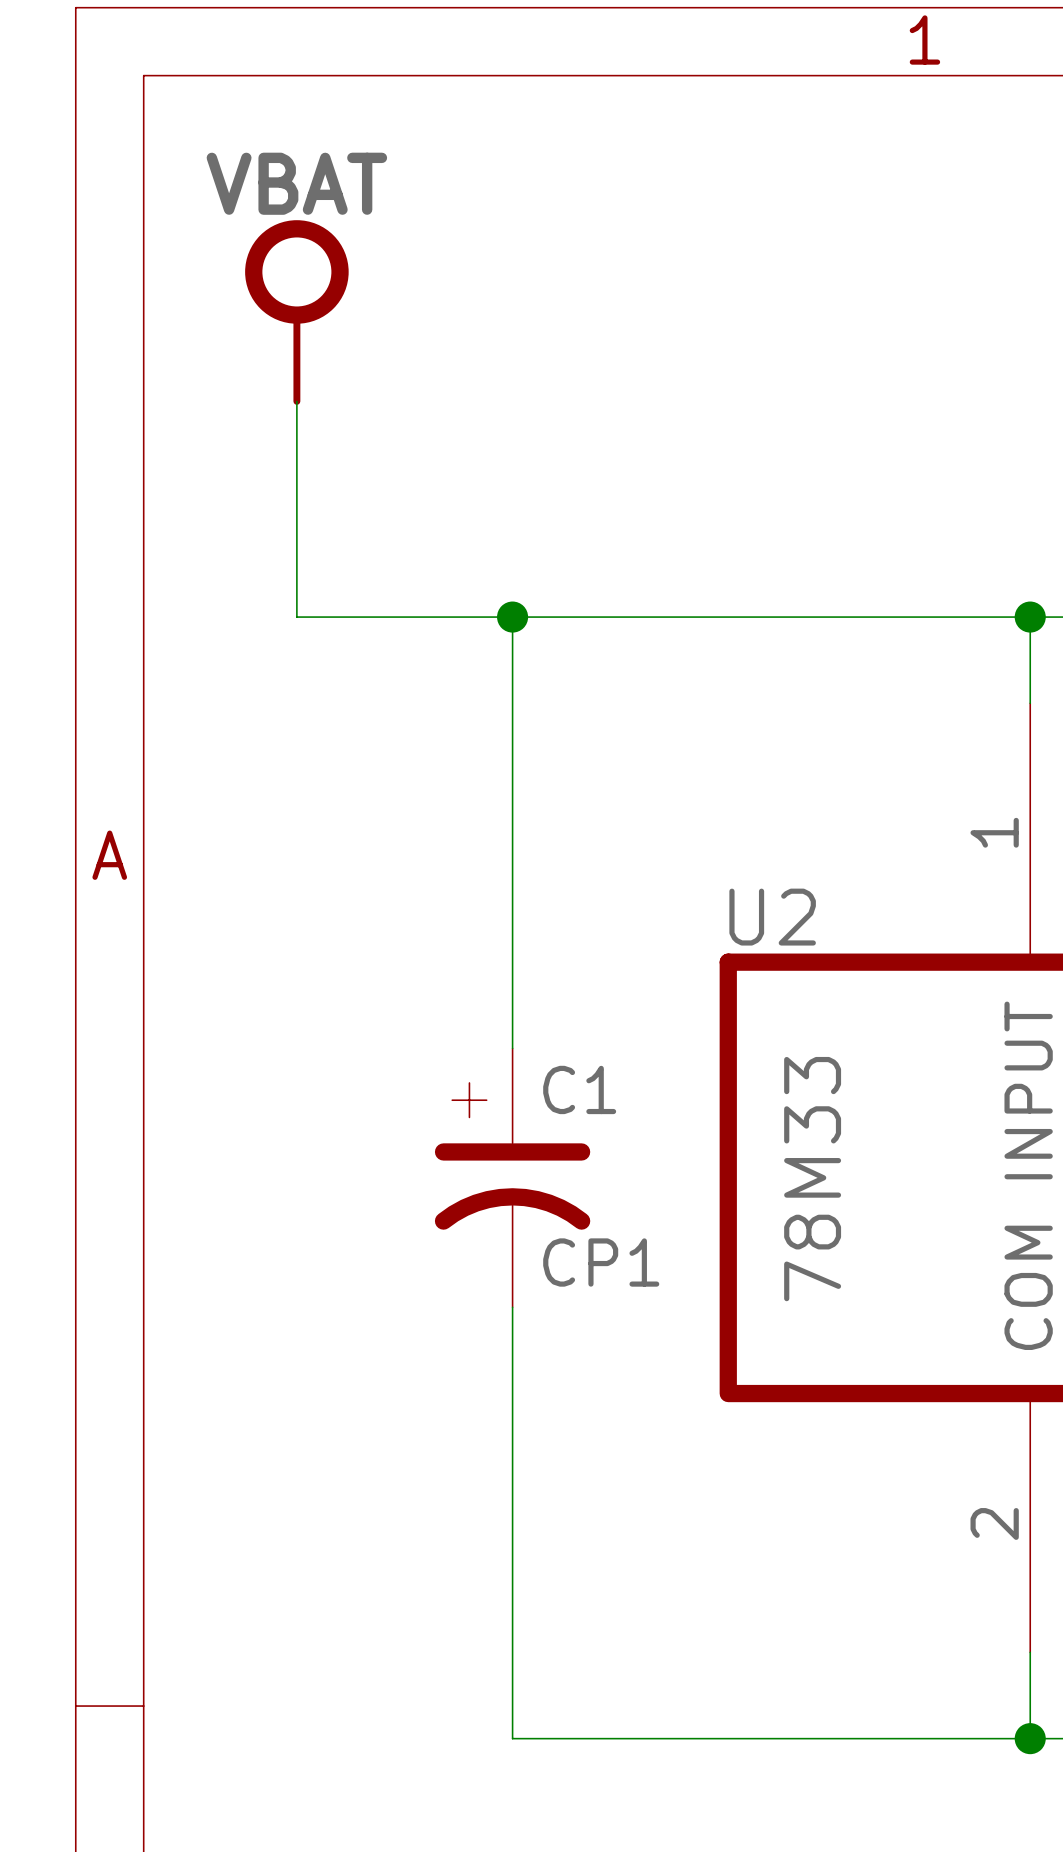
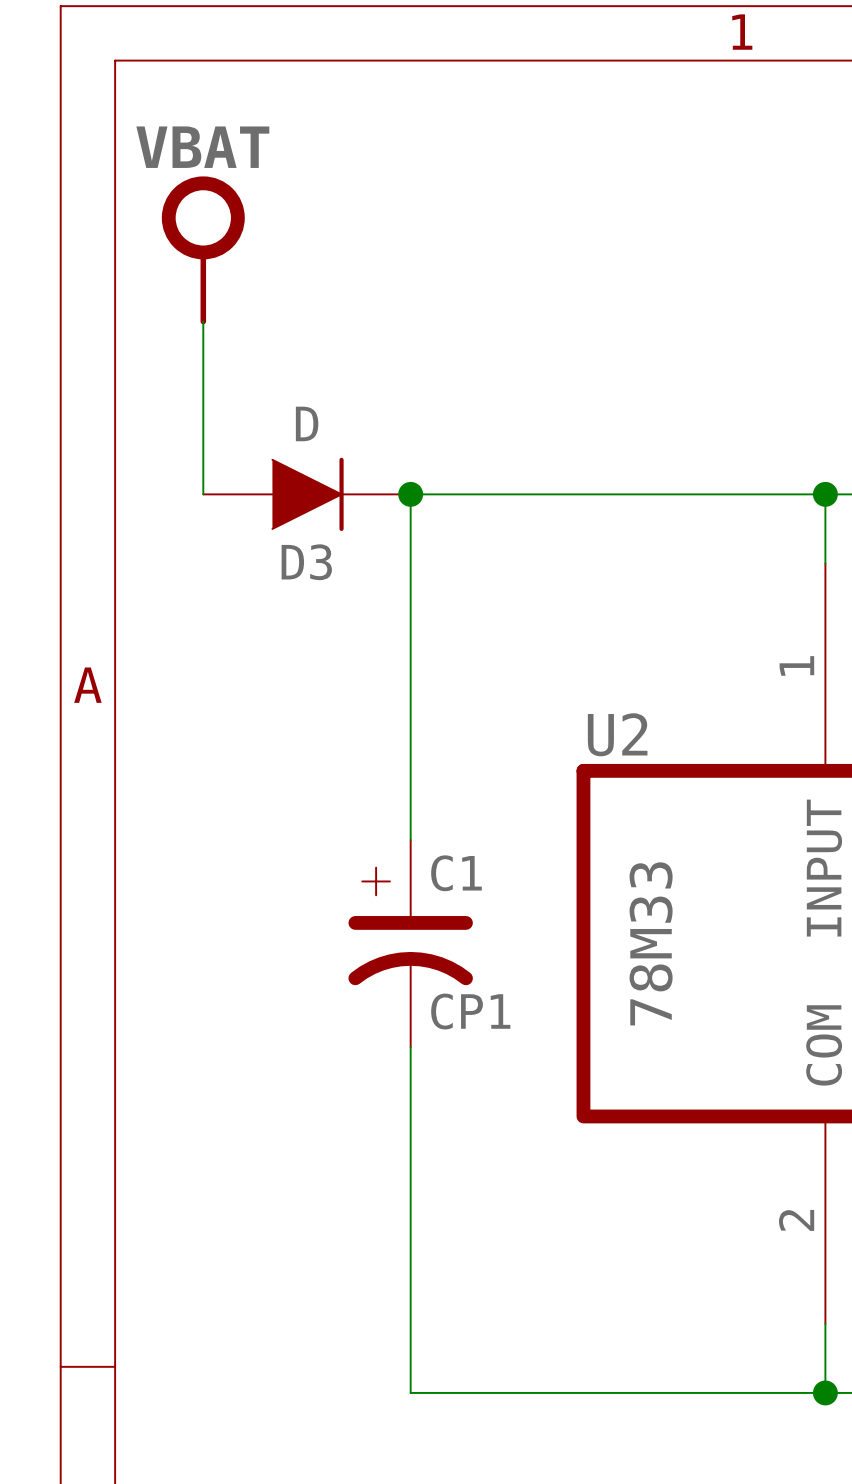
power symbol position: (296, 312) -> (203, 250)
wire: none -> (203, 321) (203, 494)
wire: (296, 401) (296, 617) (512, 617) -> none
D3: none -> D (306, 494)

